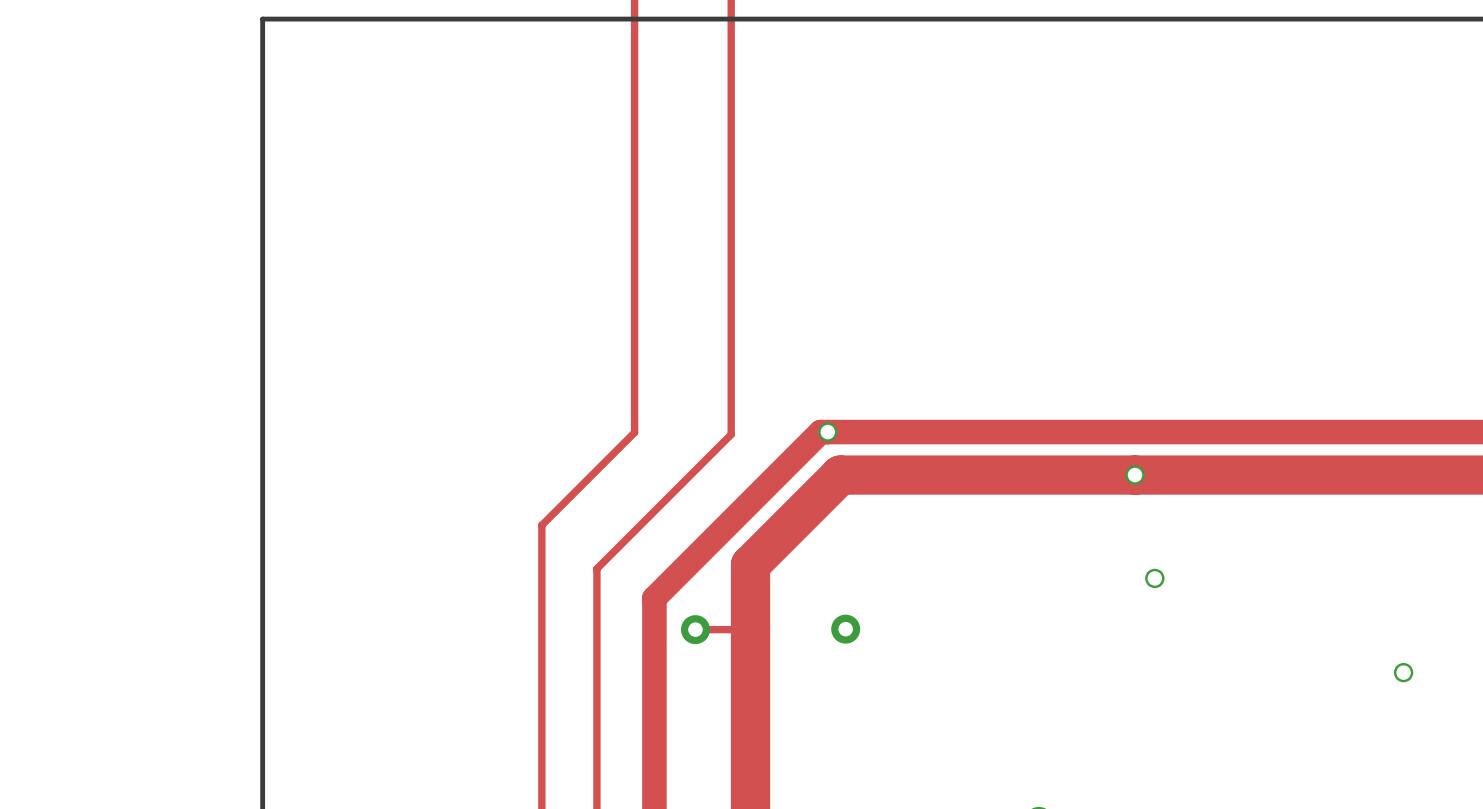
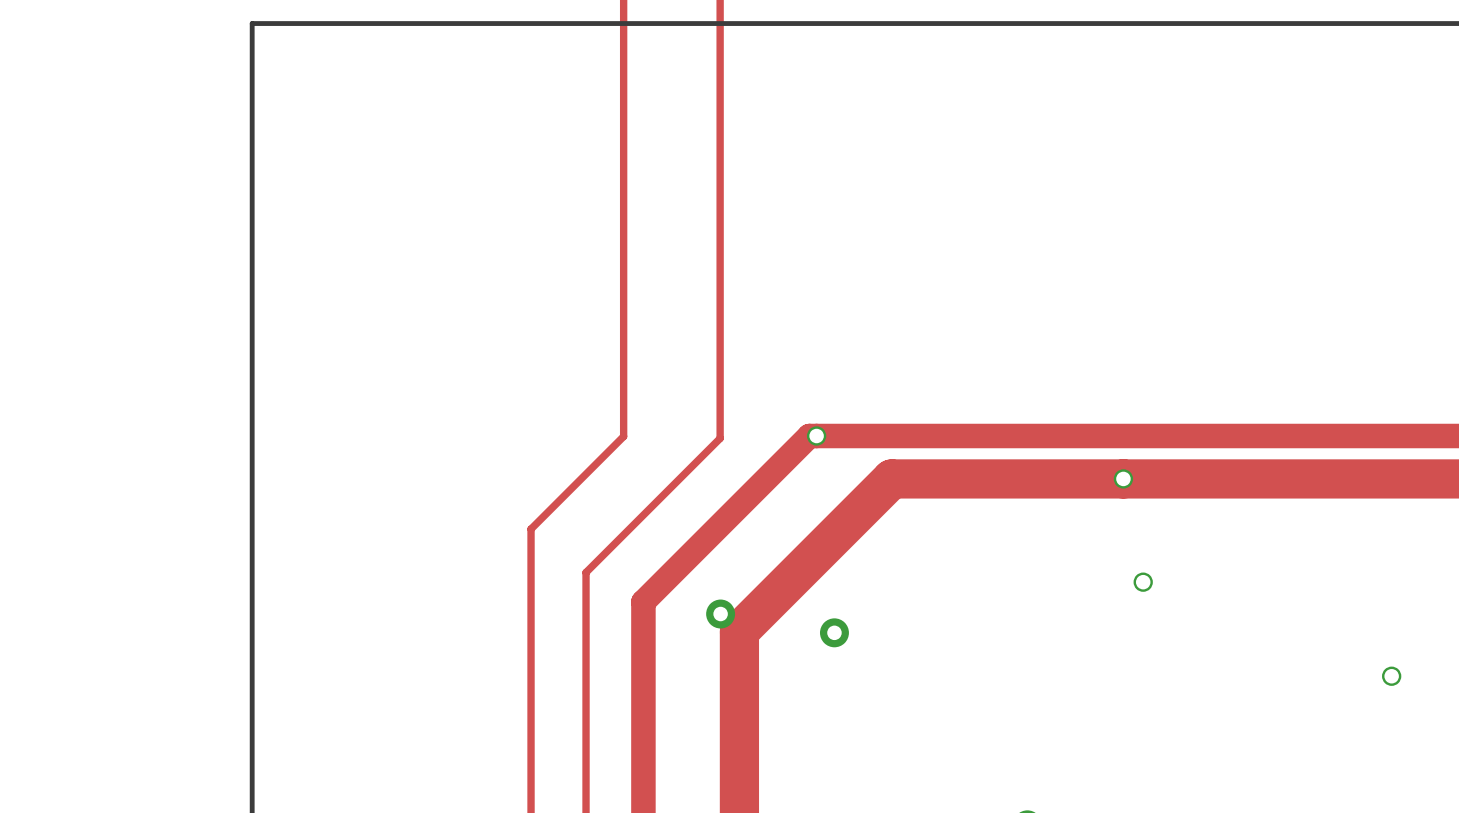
track: (903, 475) (840, 475) (750, 564) (750, 627) (748, 629) (695, 629) -> (891, 478) (739, 631) (720, 614)
via position: (695, 629) -> (720, 614)

